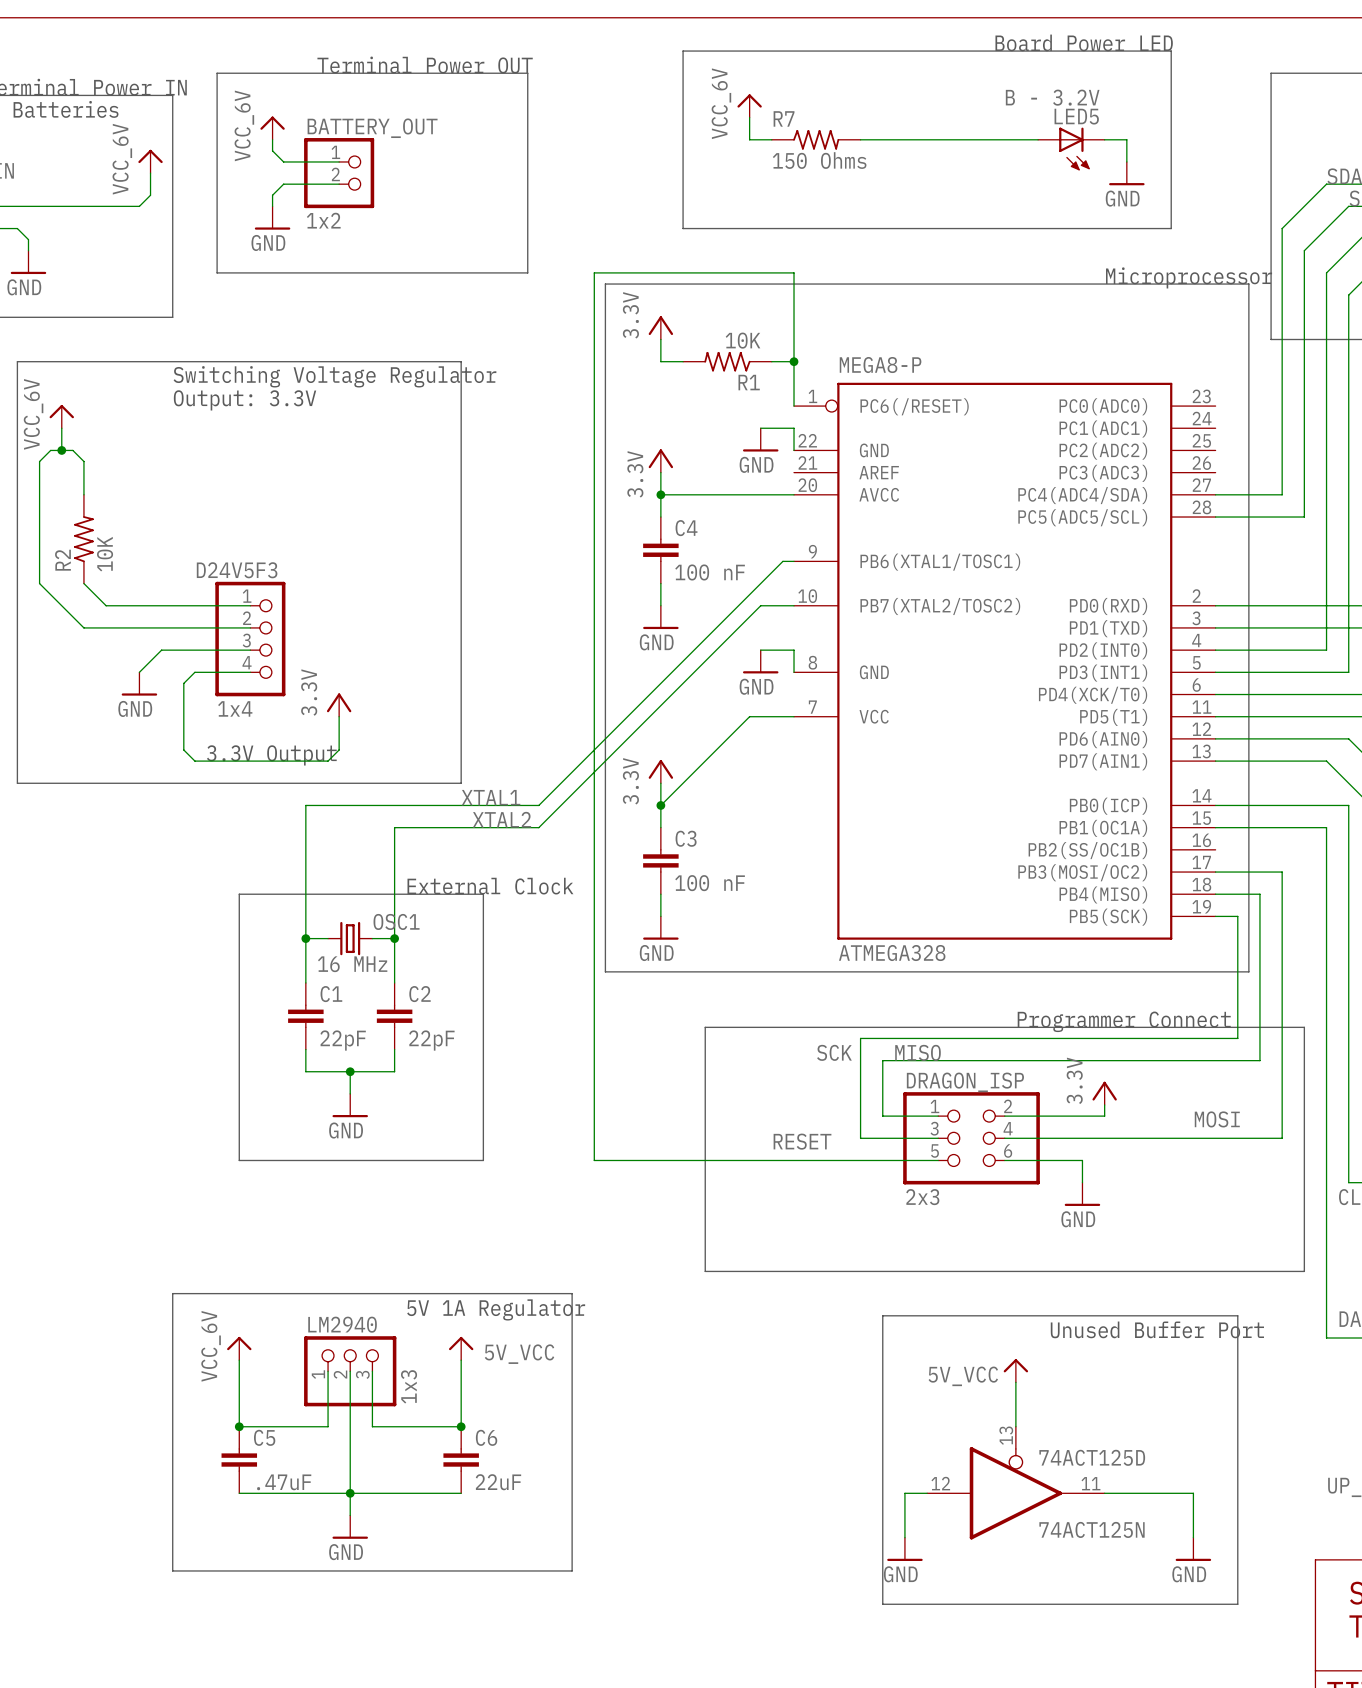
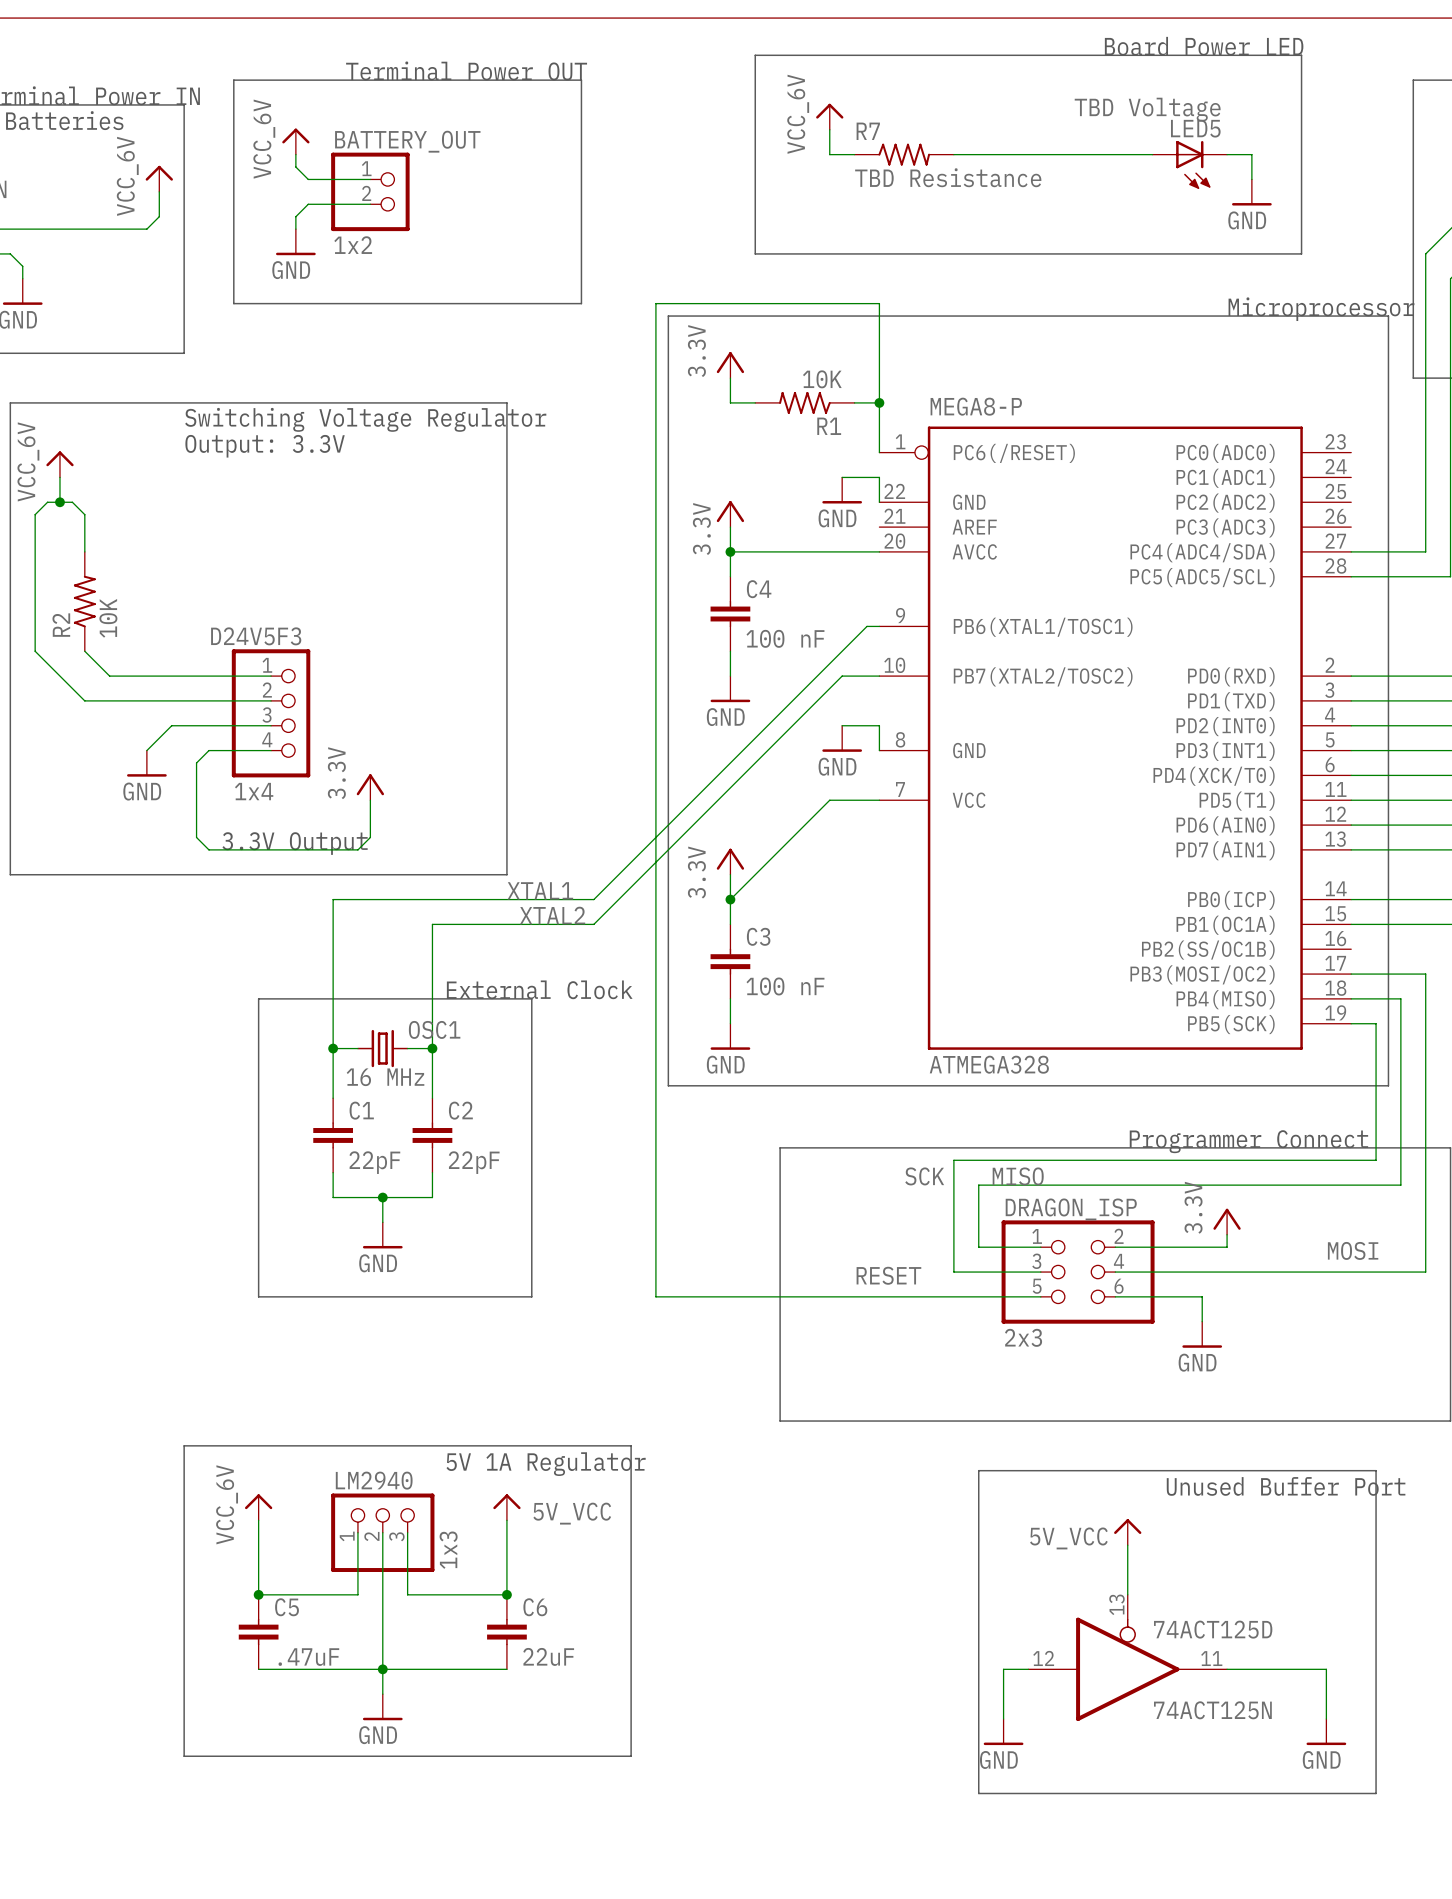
LED5 value: B - 3.2V (1052, 97) -> TBD Voltage (1147, 109)
R7 value: 150 Ohms (819, 160) -> TBD Resistance (948, 177)

